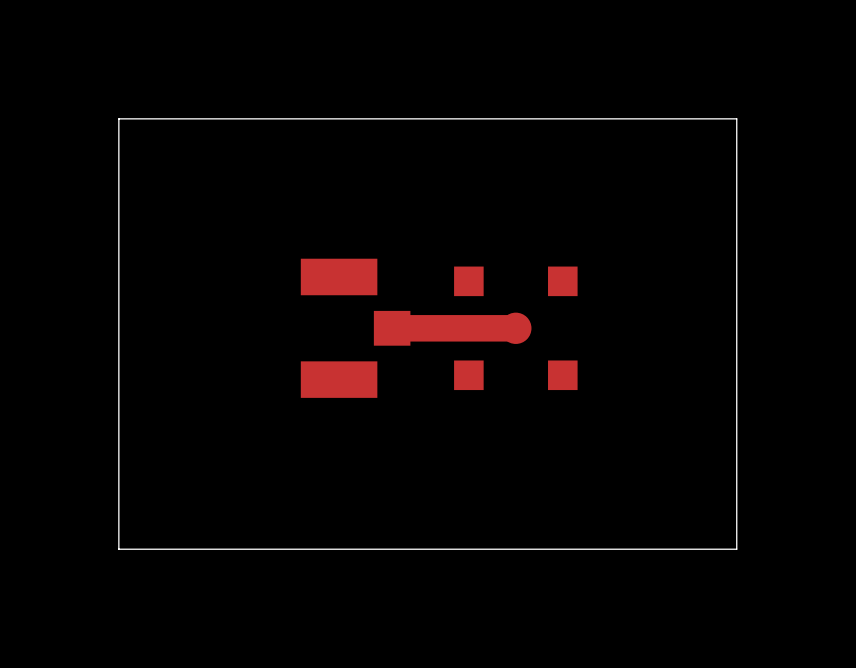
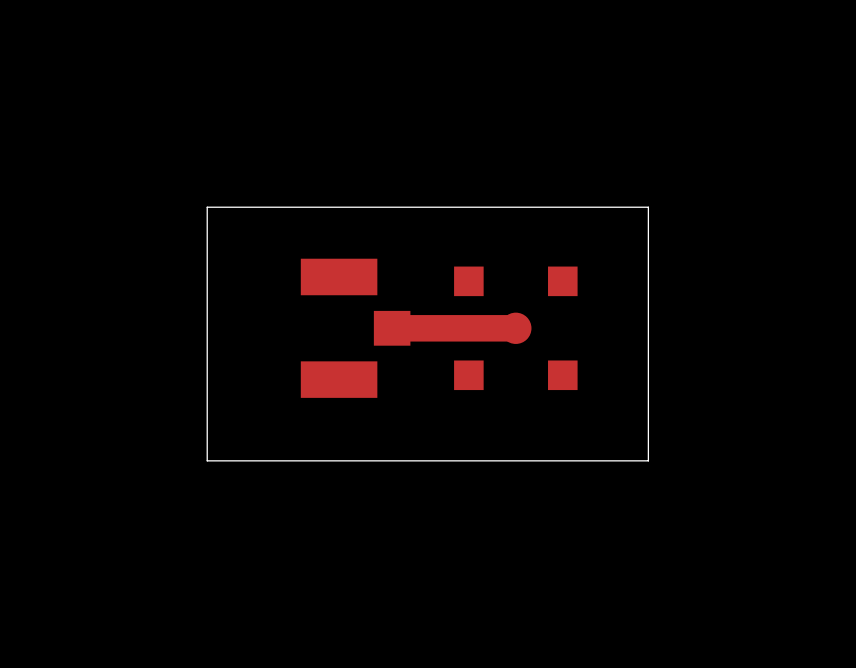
board edge: (736, 118) (118, 118) (118, 549) (736, 549) (736, 118) -> none
board edge: none -> (648, 207) (207, 207) (207, 460) (648, 460) (648, 207)

